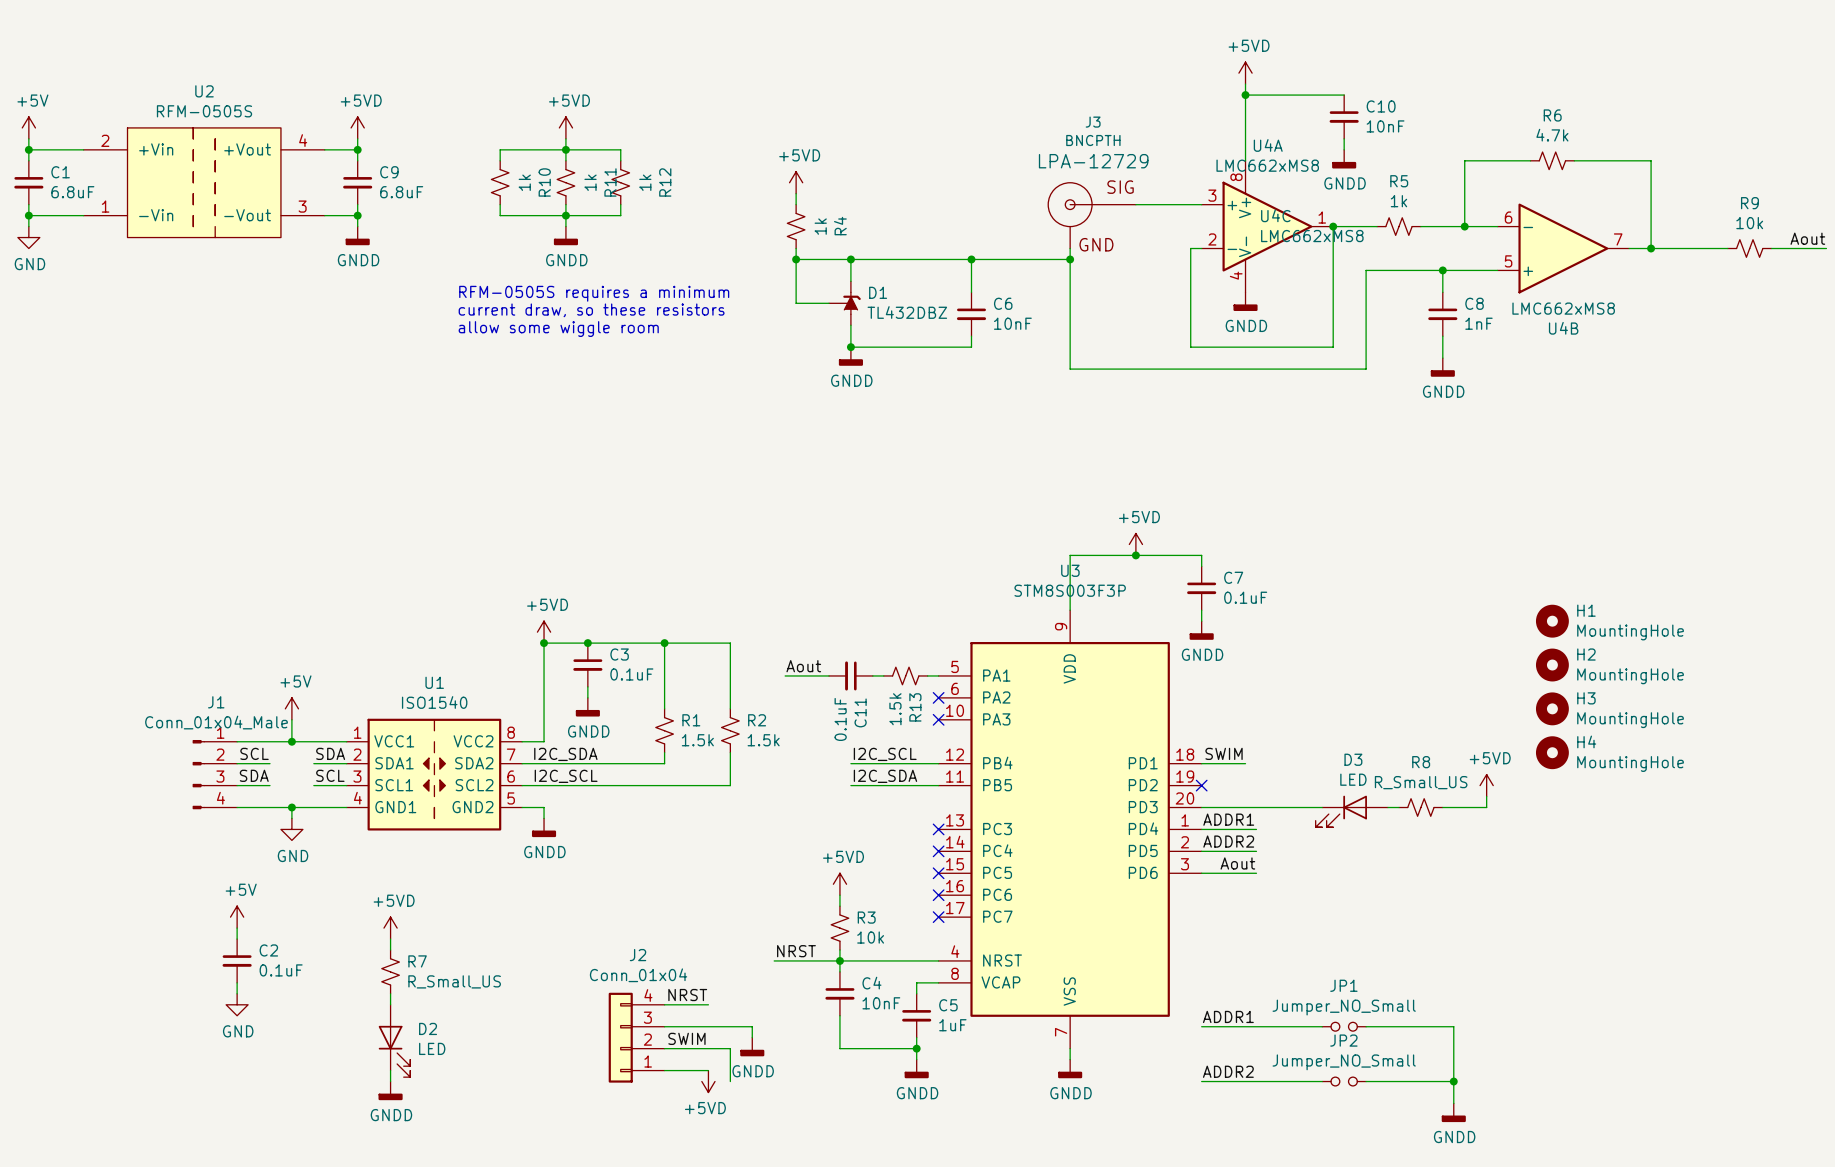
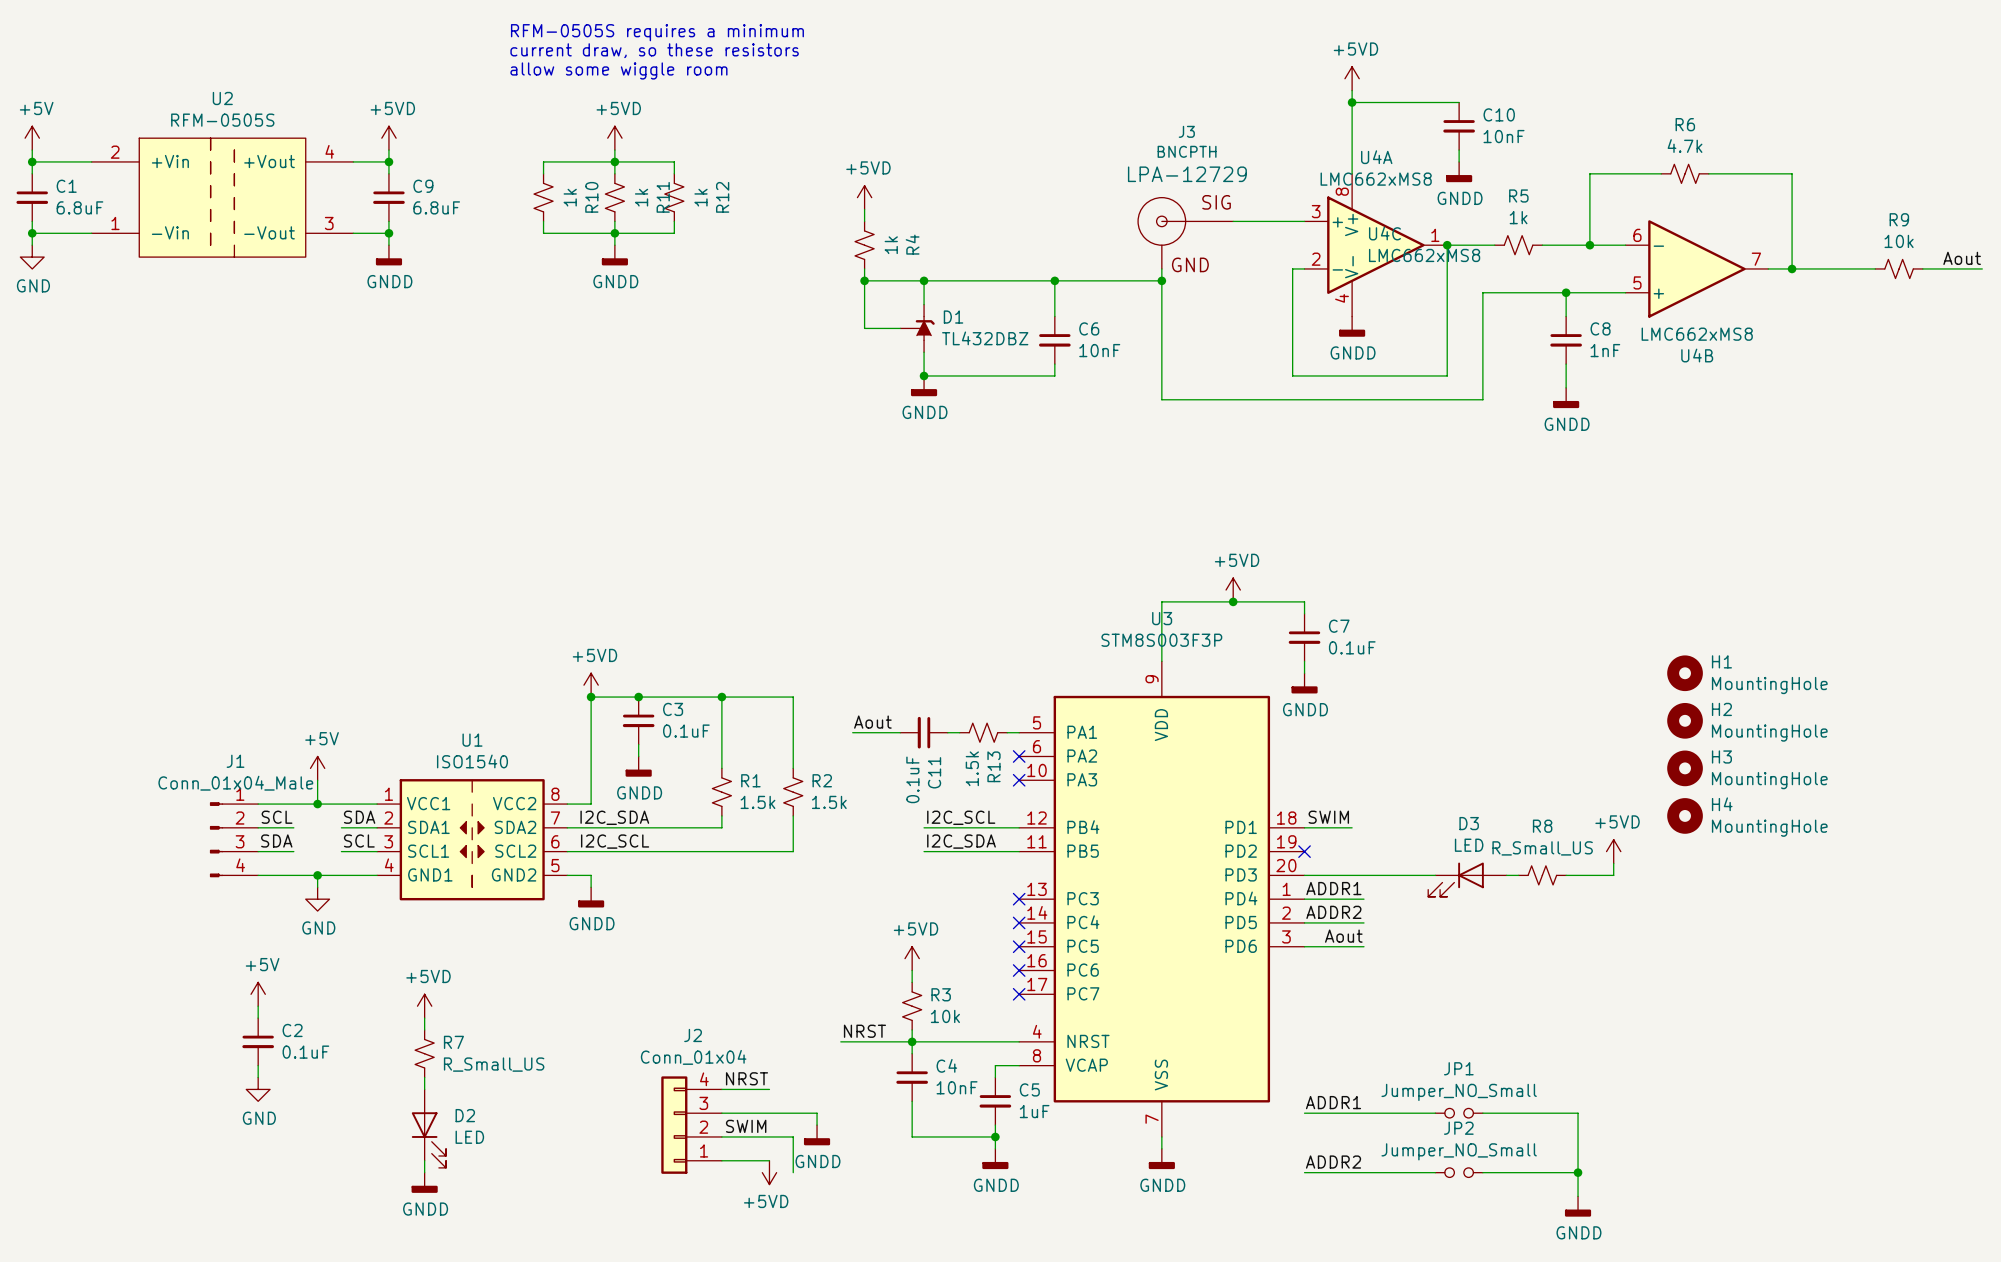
text: none -> RFM-0505S requires a minimum (657, 32)
text: none -> current draw, so these resistors (654, 50)
text: none -> allow some wiggle room (618, 70)
text: RFM-0505S requires a minimum (594, 293) -> none
text: current draw, so these resistors (591, 310) -> none
text: allow some wiggle room (558, 329) -> none

